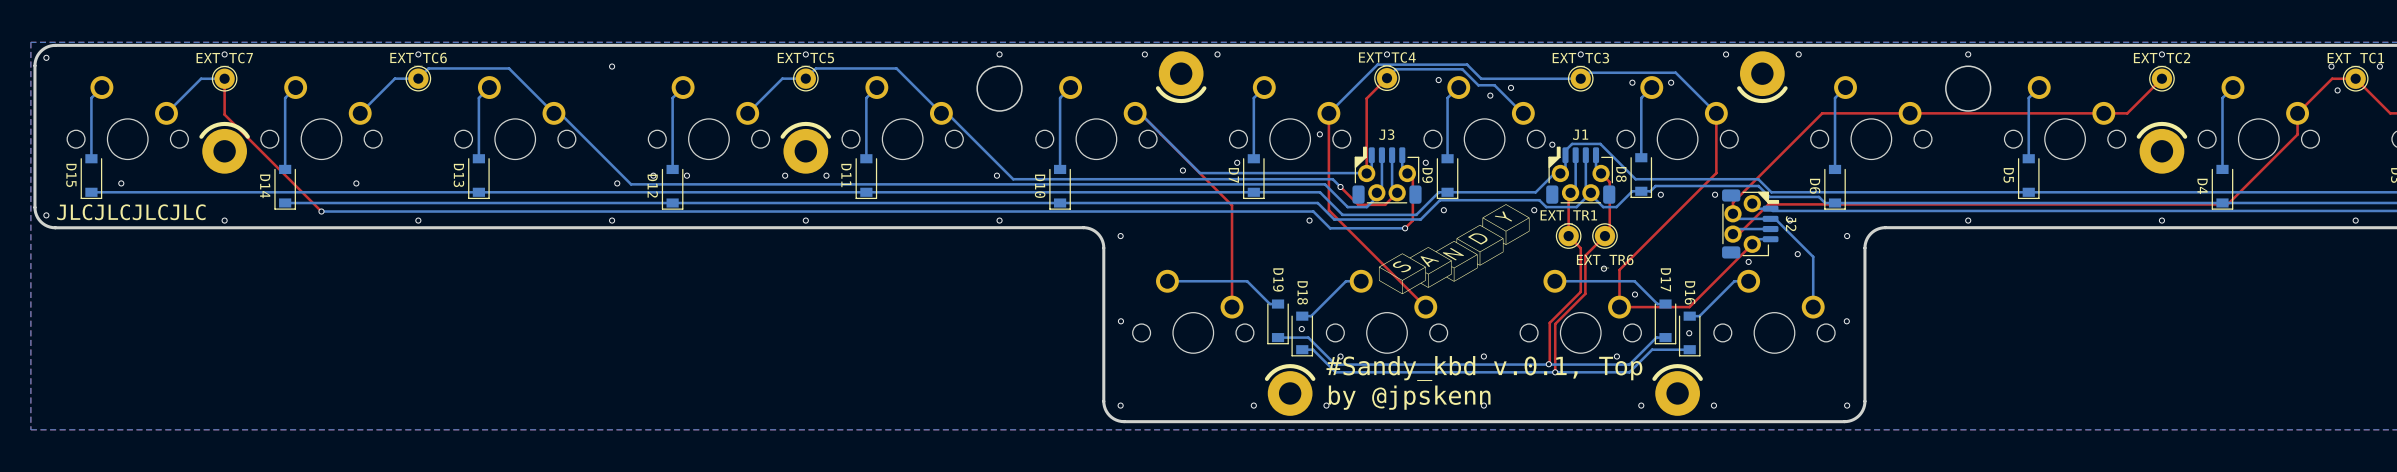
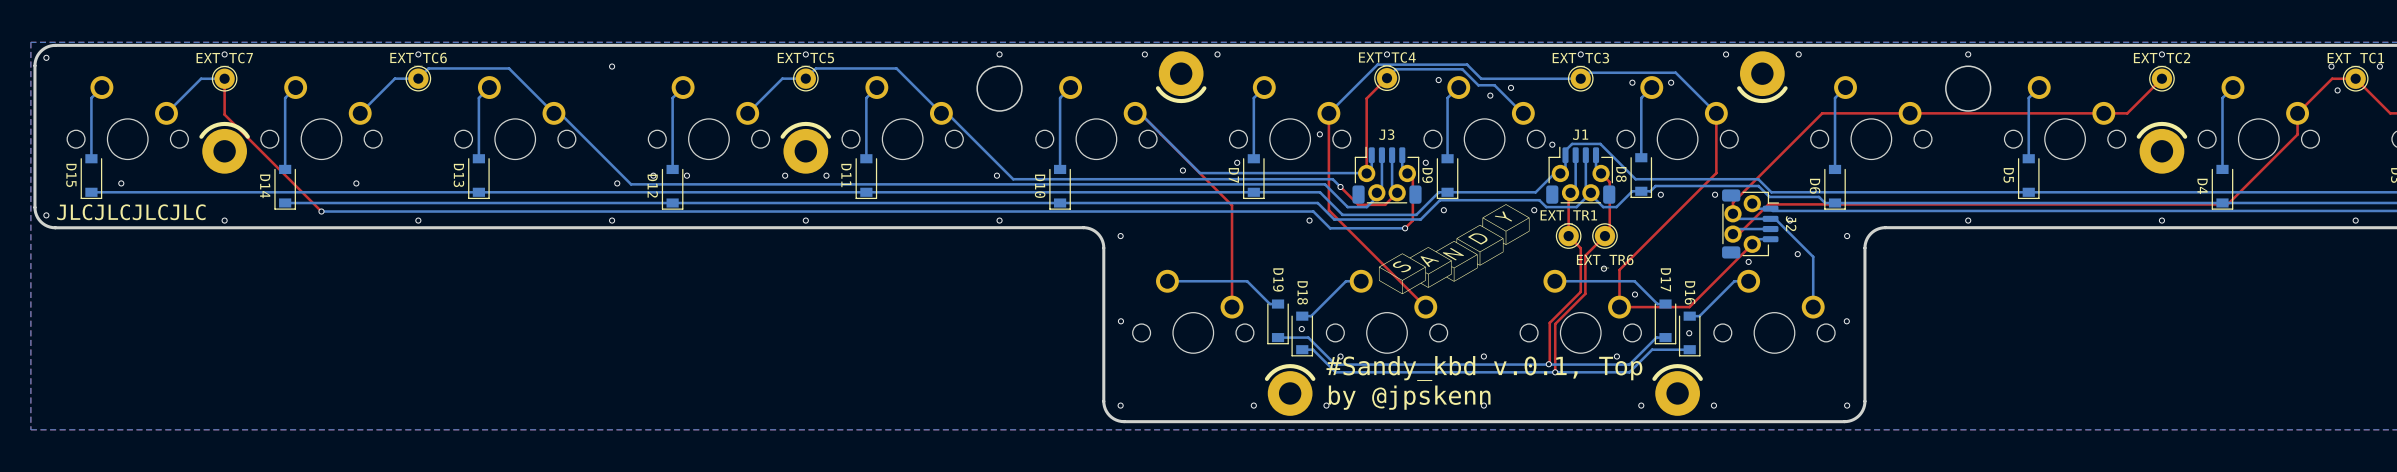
J3 footprint: [1352, 146, 1422, 204] -> [1352, 146, 1422, 204]
J1 footprint: [1546, 146, 1616, 204] -> [1546, 146, 1616, 204]
J2 footprint: [1722, 189, 1780, 259] -> [1722, 189, 1780, 259]

